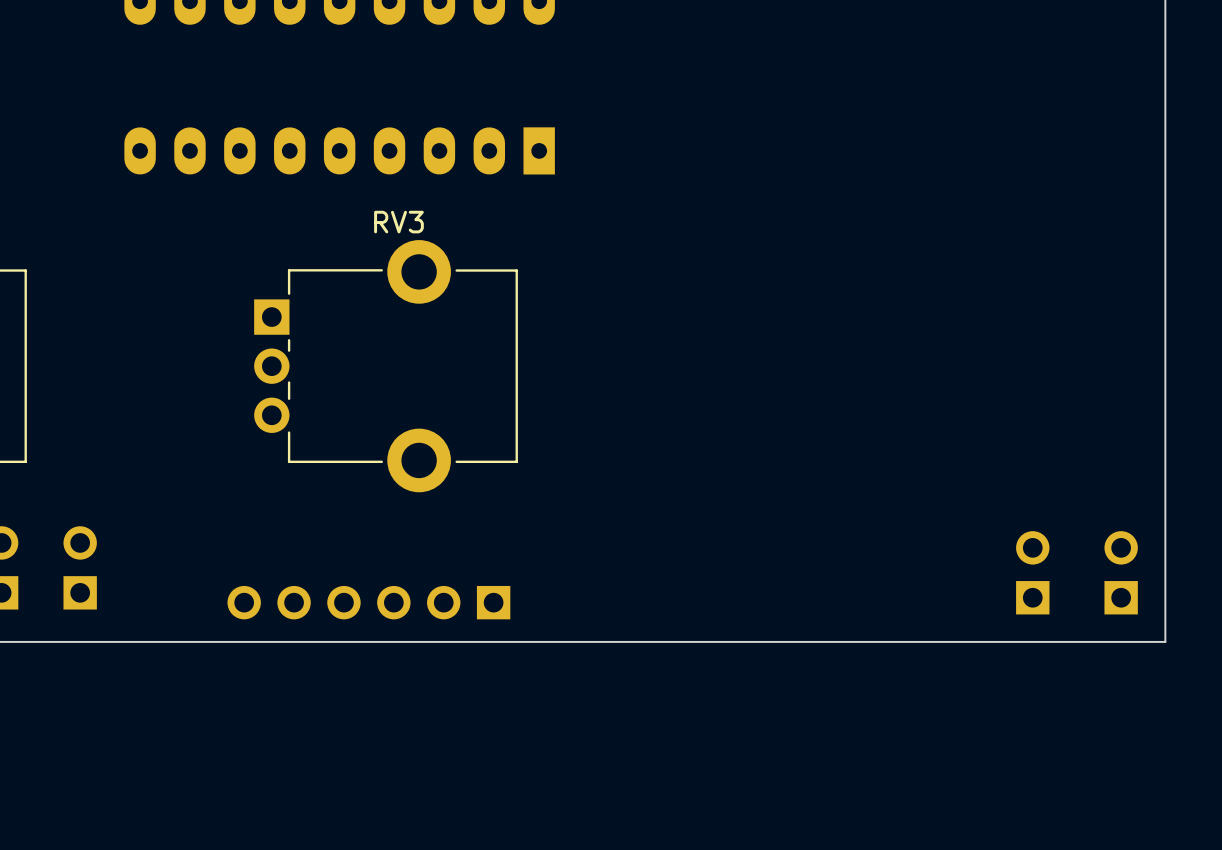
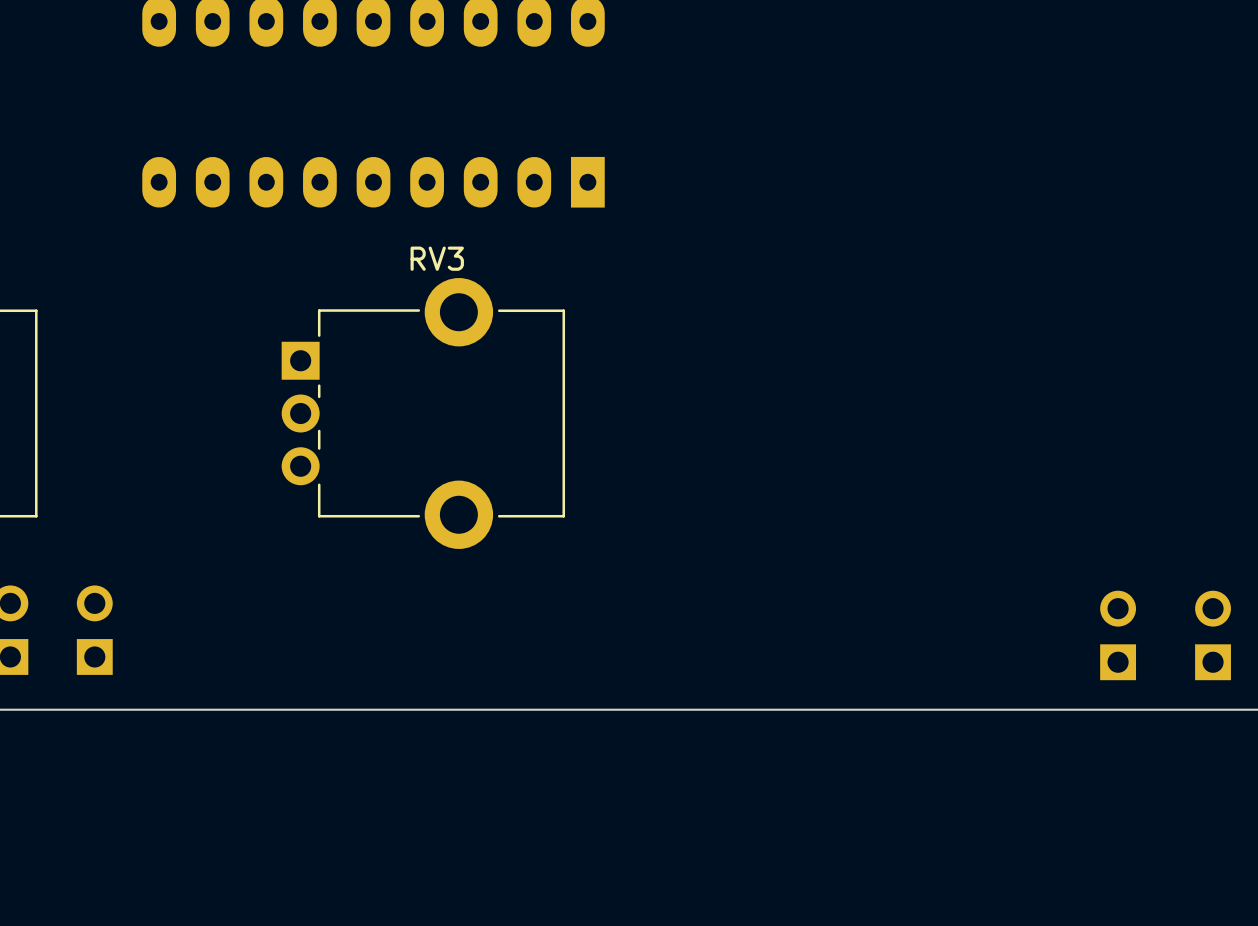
part: (368, 602) -> none

